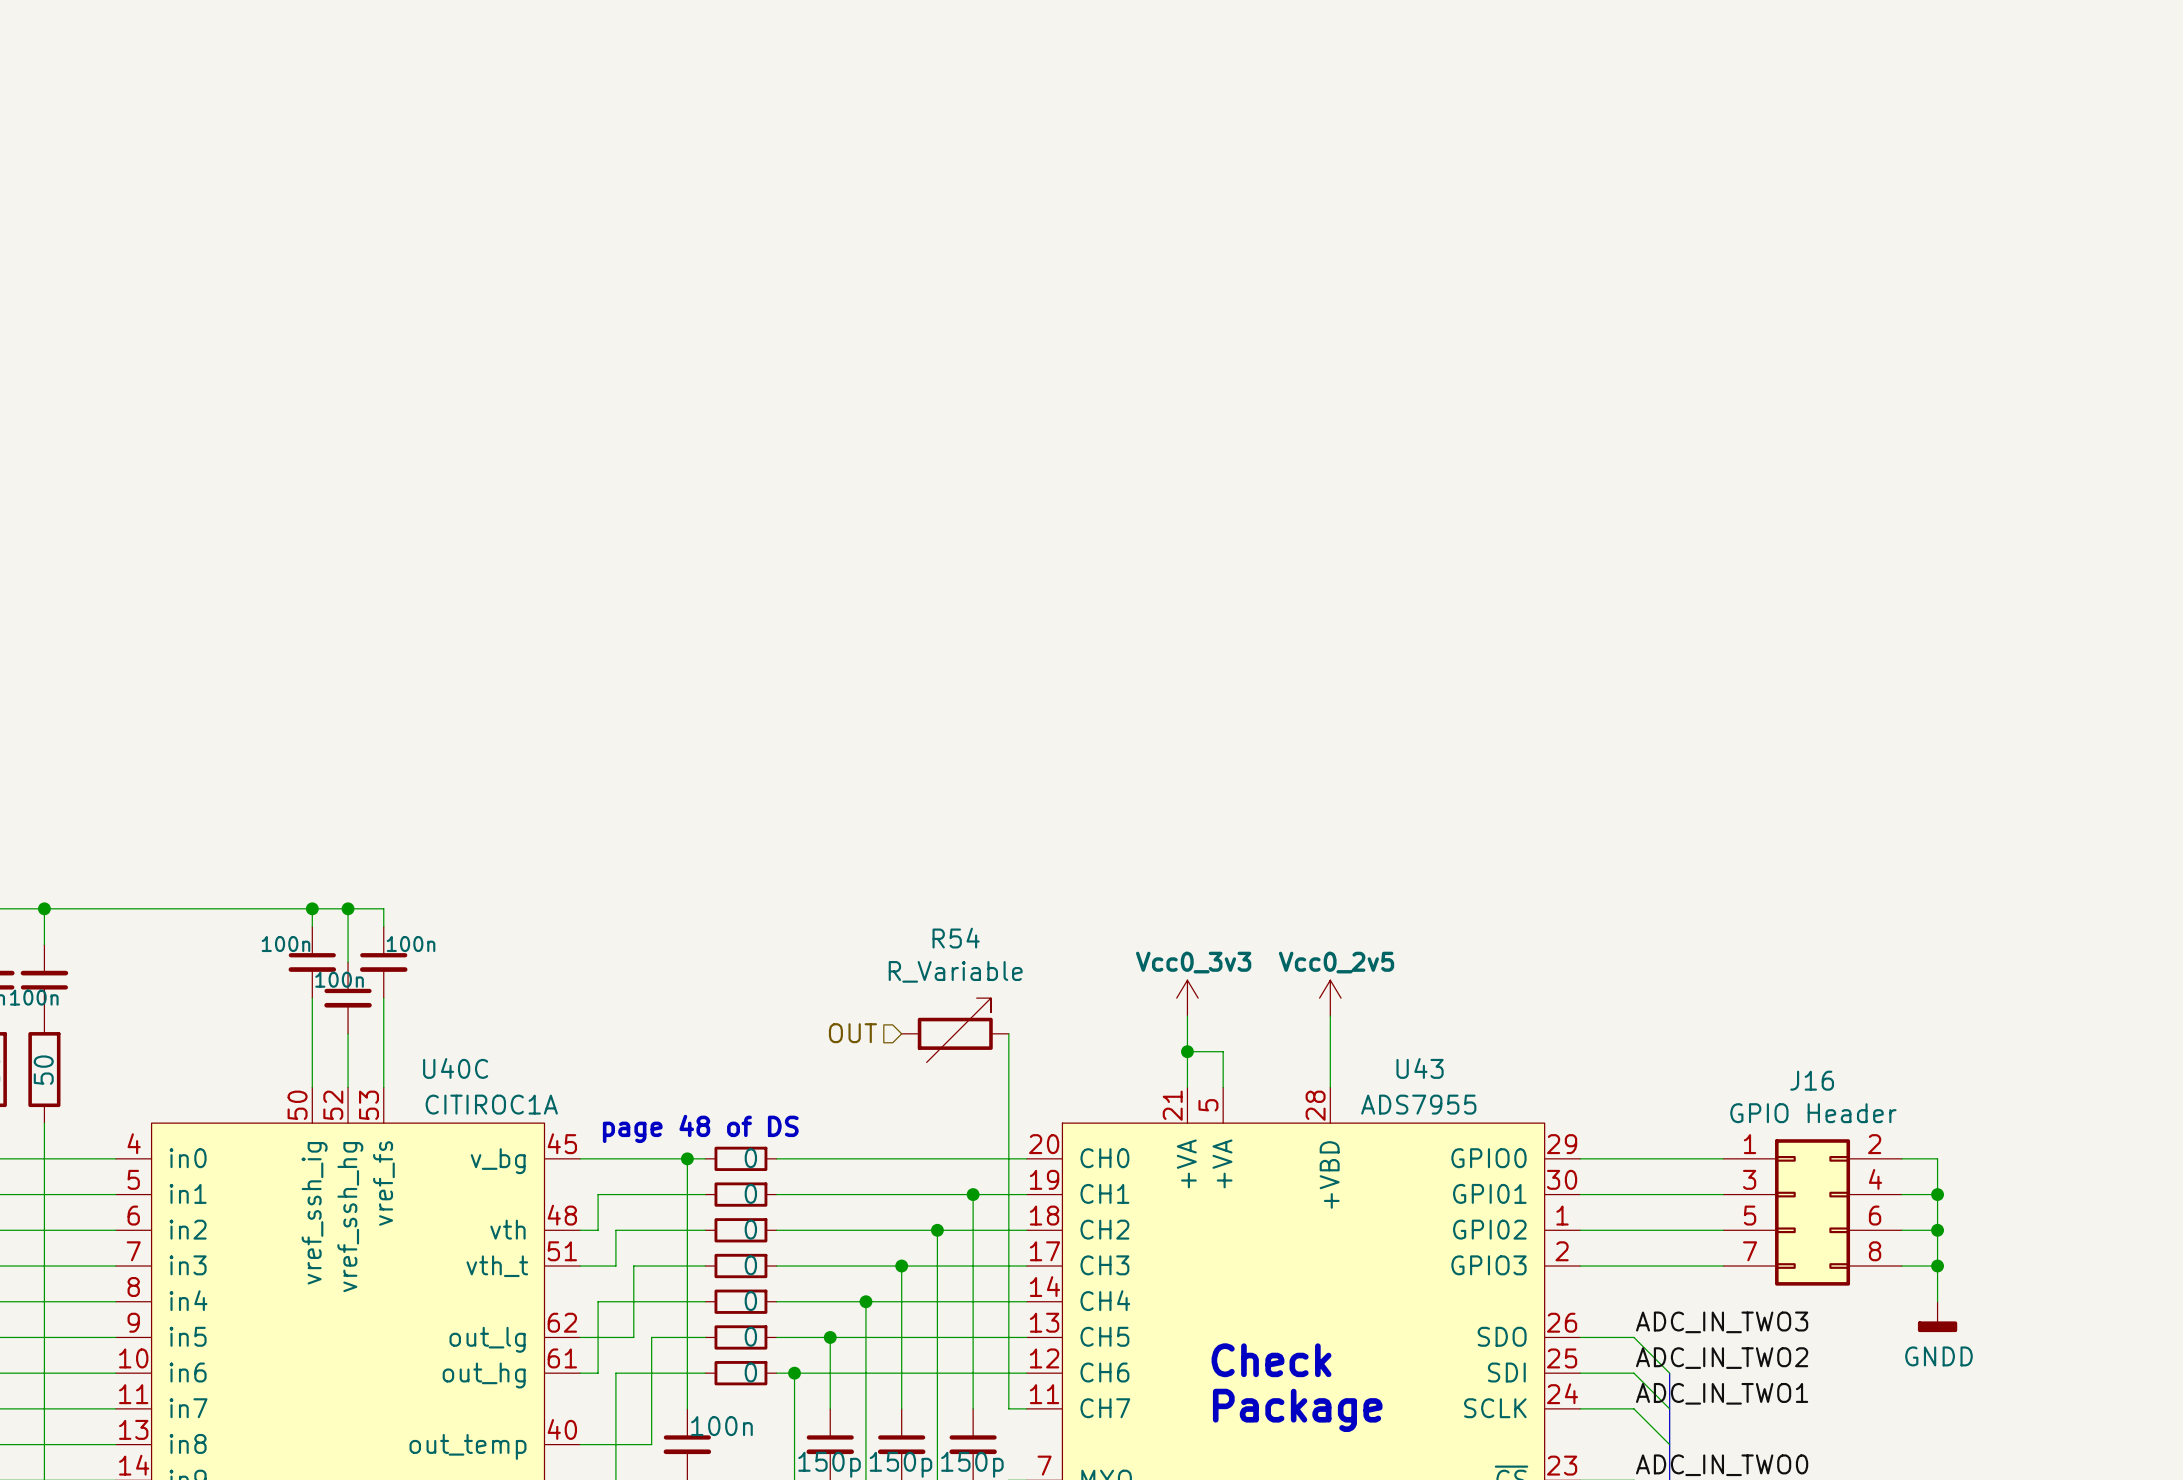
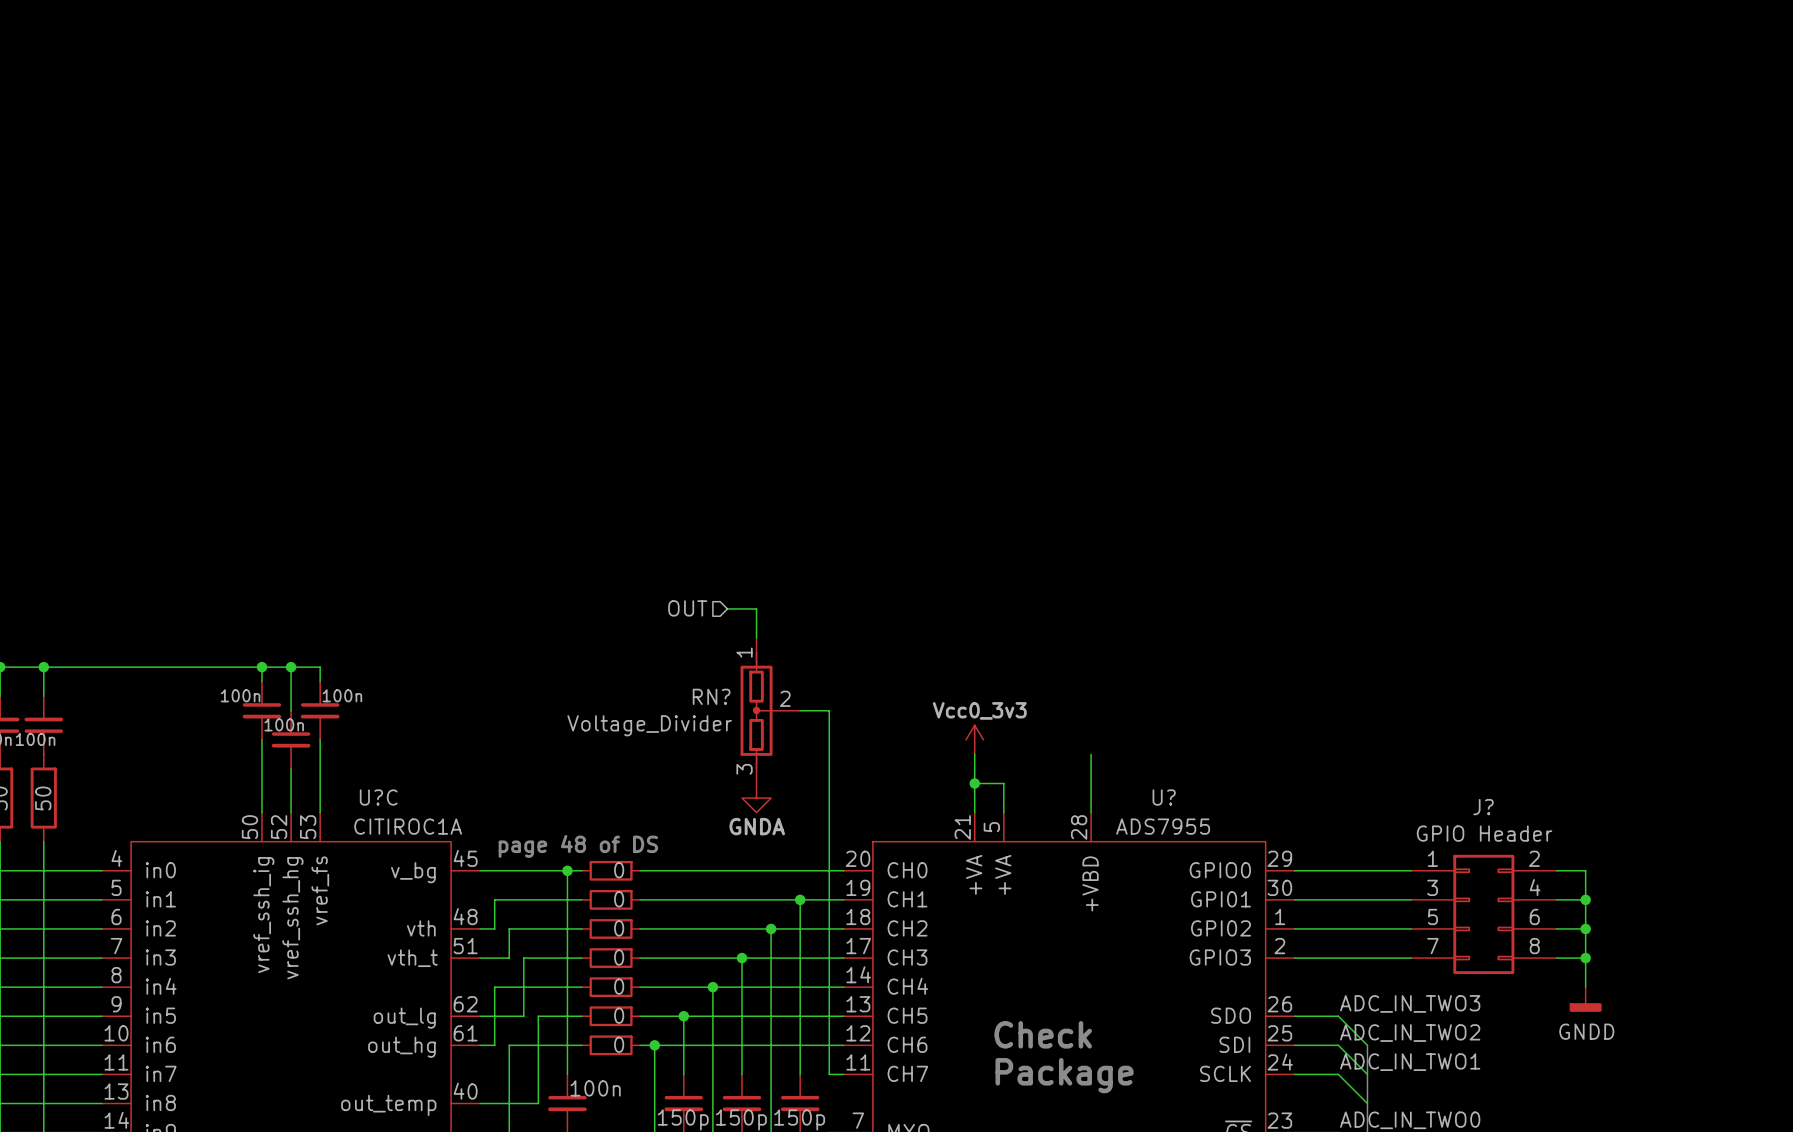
wire: none -> (727, 608) (756, 608) (756, 638)
RN?: none -> Voltage_Divider (770, 710)
wire: none -> (800, 710) (829, 710) (829, 768)
part: Vcc0_2v5 (1330, 998) -> none
R54: R_Variable (955, 1030) -> none
hierarchical label position: OUT (852, 1033) -> OUT (687, 608)
U40C name: U40C (455, 1068) -> U?C (378, 797)
U43 name: U43 (1420, 1068) -> U? (1164, 797)
power symbol: none -> GNDA (756, 798)
J16 name: J16 (1812, 1080) -> J? (1483, 807)

